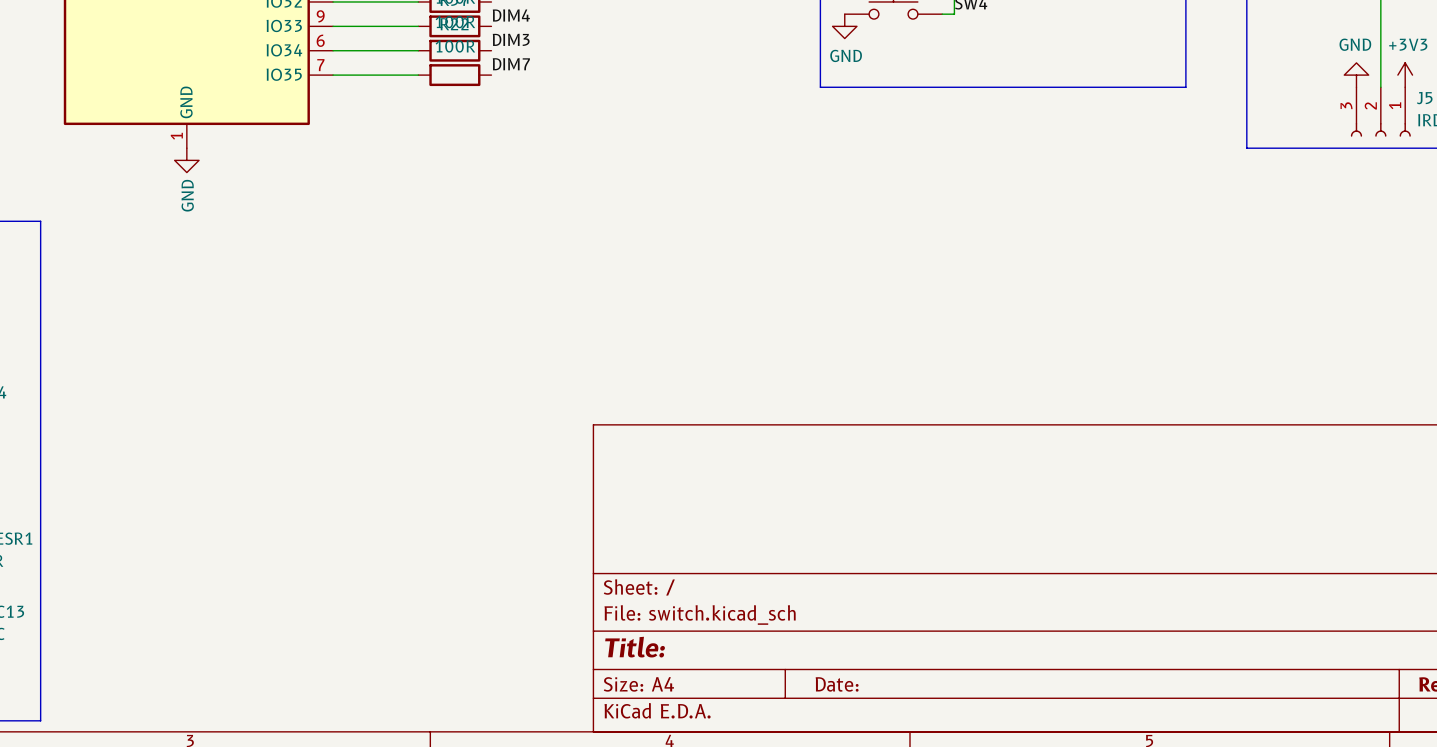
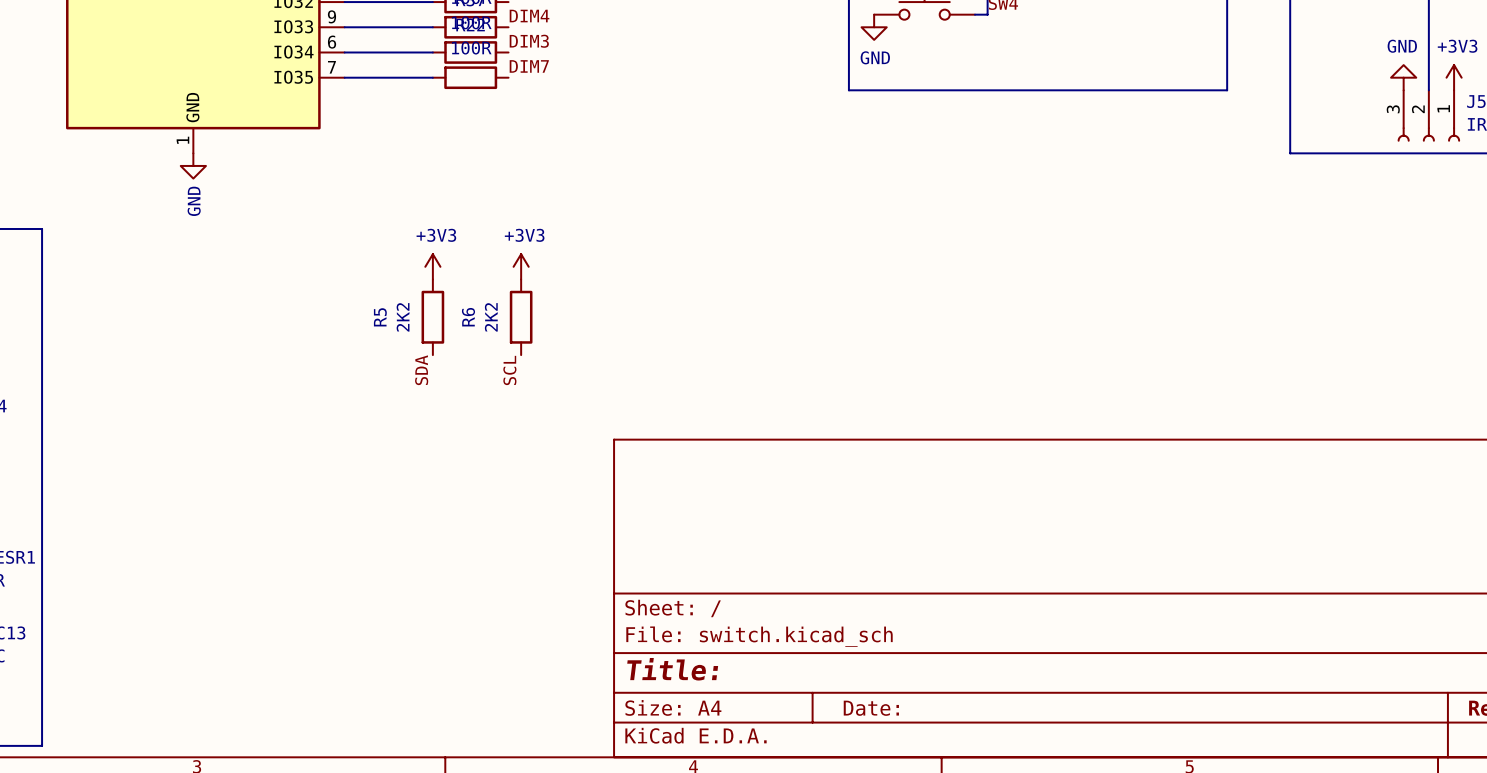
power symbol: none -> +3V3 (432, 266)
power symbol: none -> +3V3 (521, 266)
R5: none -> 2K2 (432, 317)
R6: none -> 2K2 (521, 317)
label: none -> SCL (509, 370)
label: none -> SDA (421, 370)

